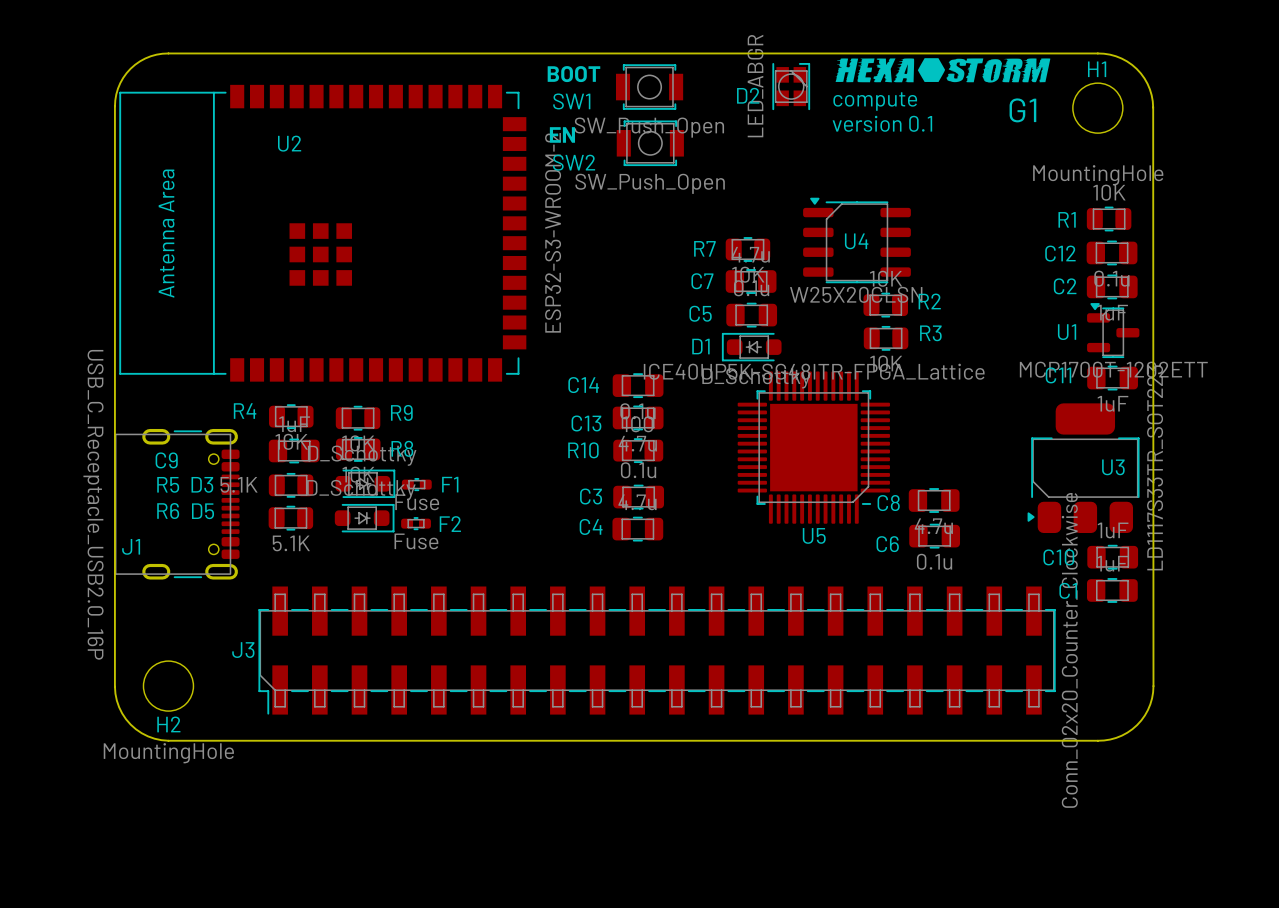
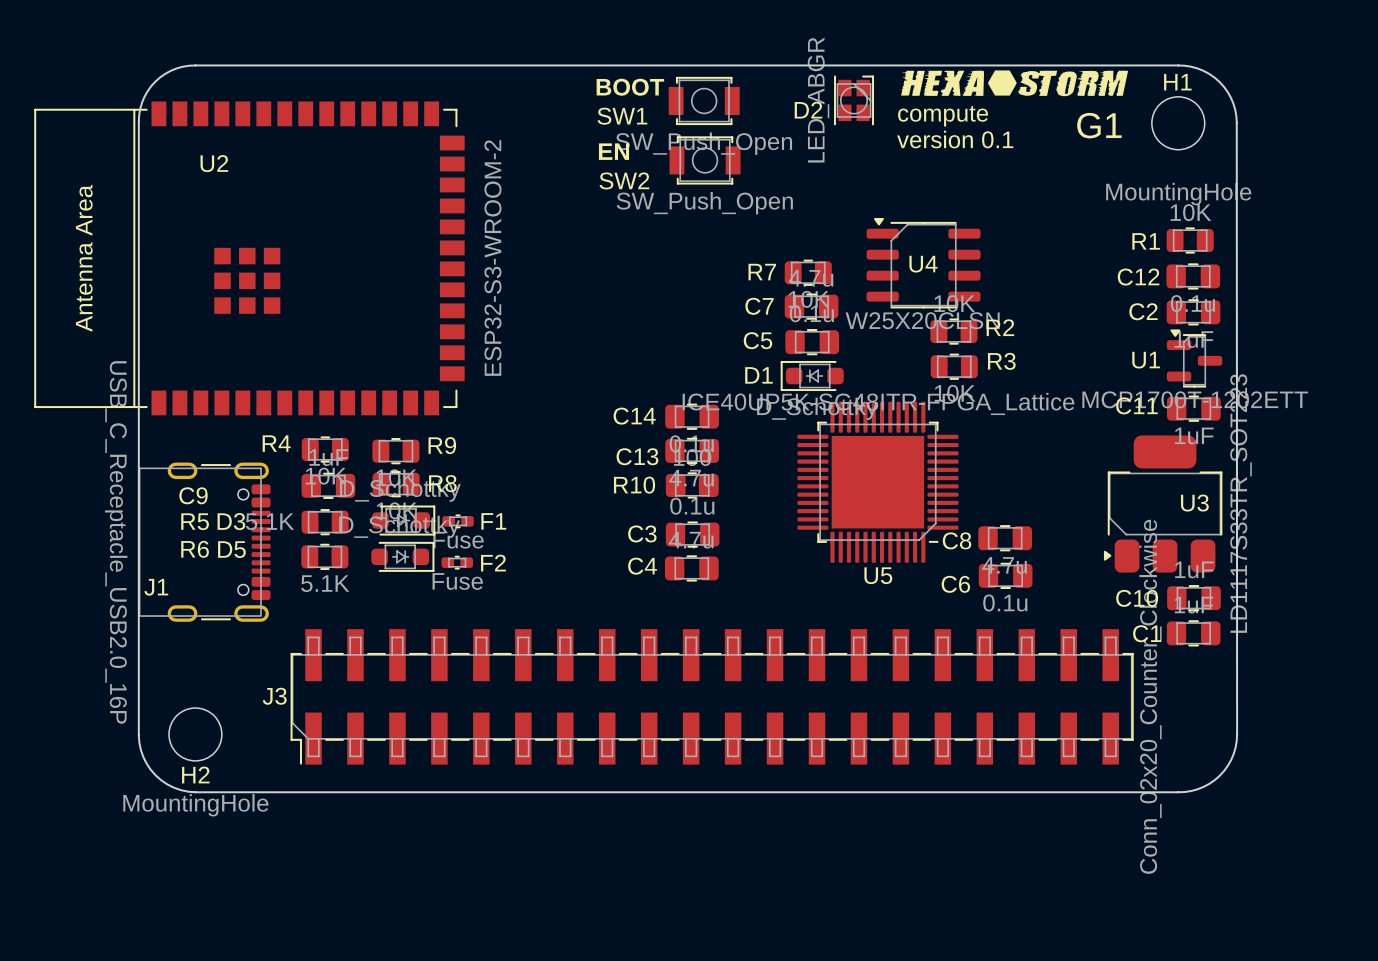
U2 position: (322, 233) -> (249, 258)

